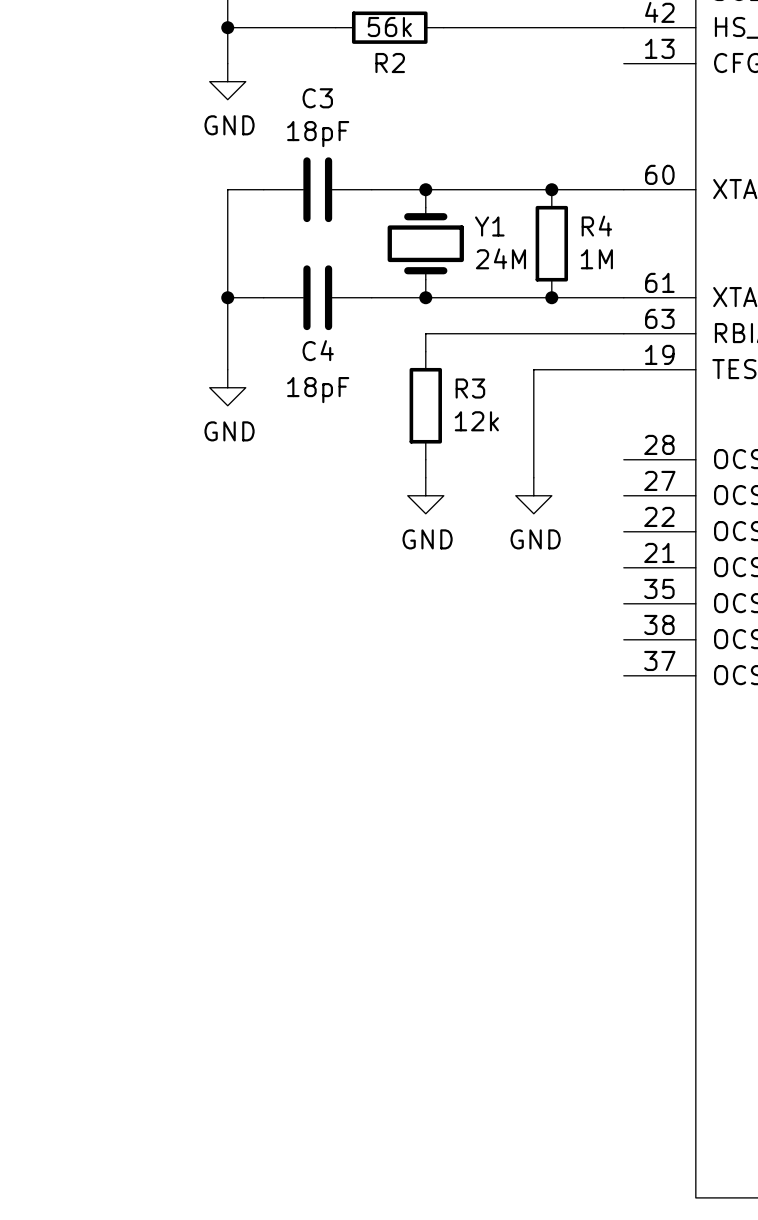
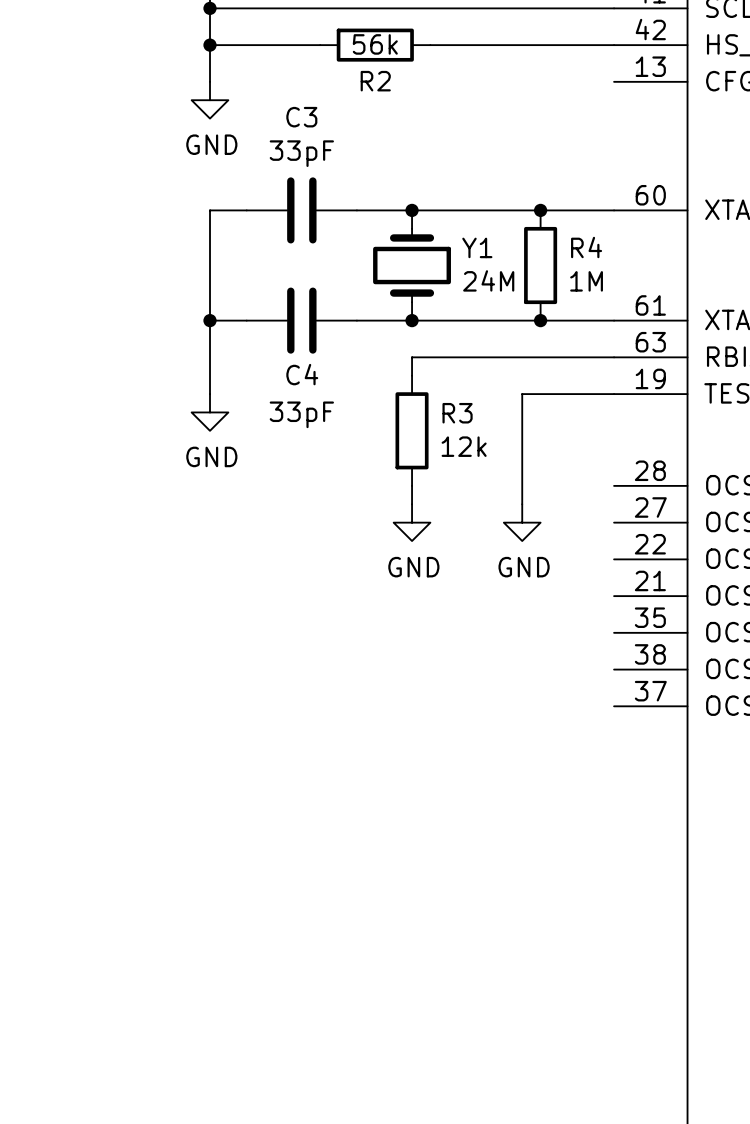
C3 value: 18pF (318, 134) -> 33pF (301, 153)
C4 value: 18pF (318, 390) -> 33pF (301, 414)

